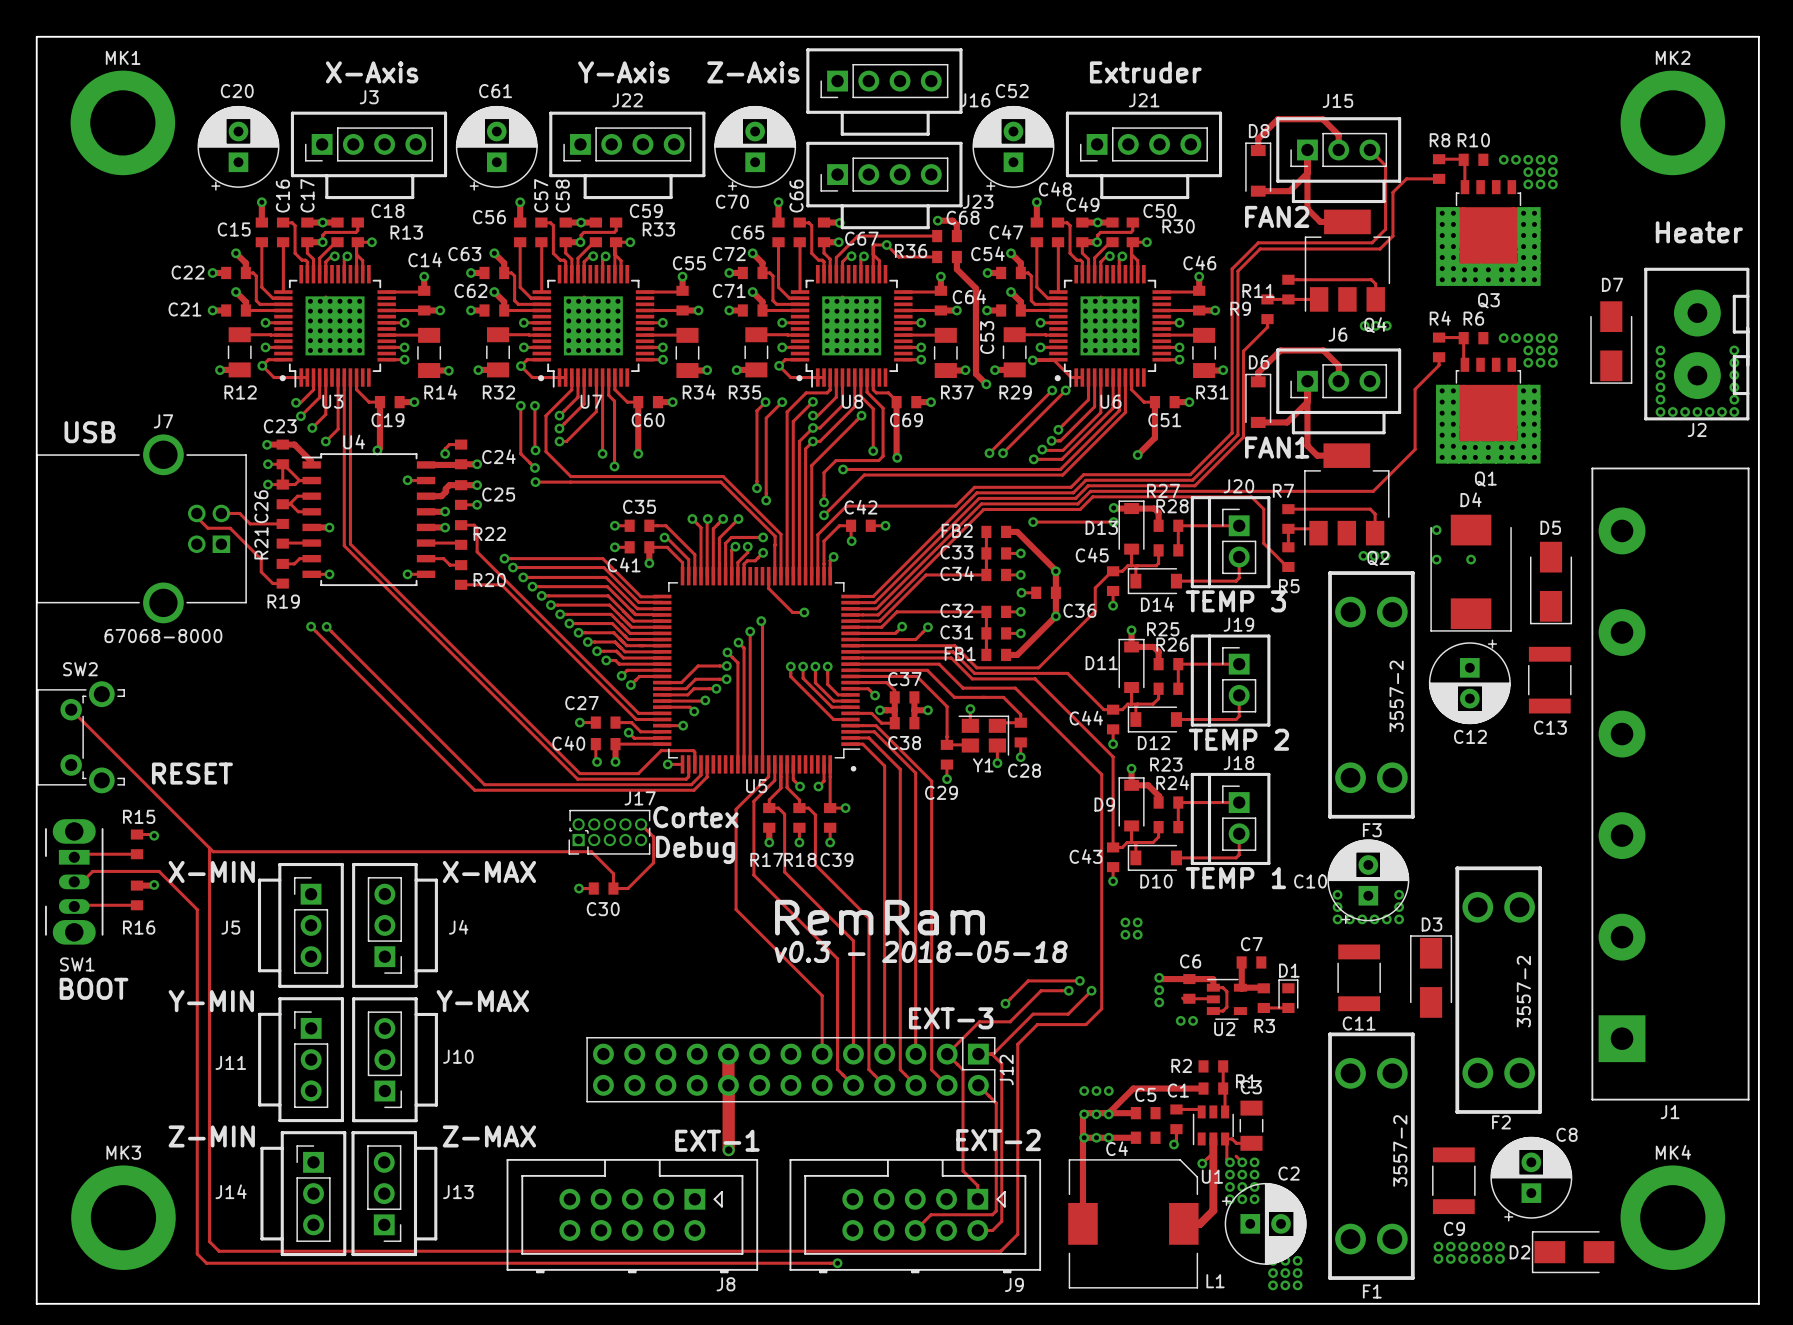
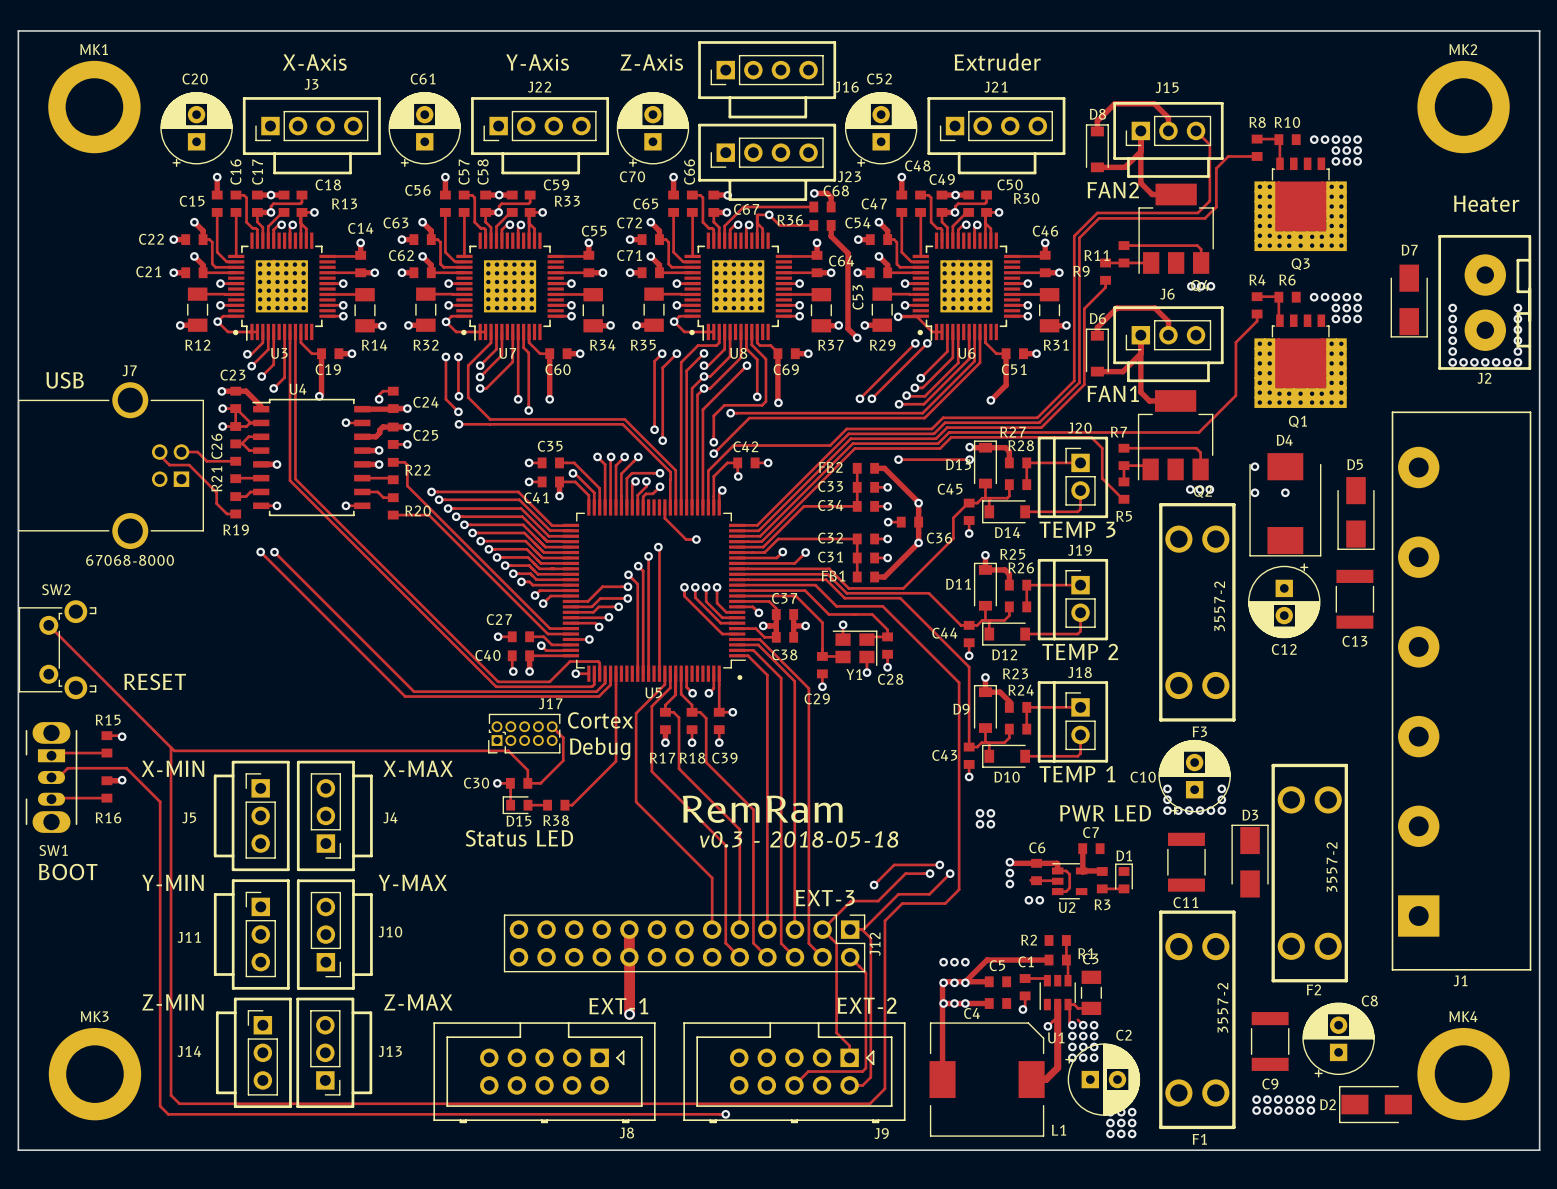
track: none -> (616, 673) (616, 761) (572, 805) (564, 805)
track: none -> (510, 783) (510, 805)
C30 name position: C30 (603, 909) -> C30 (476, 783)
D15: none -> (517, 805)
track: none -> (527, 805) (547, 805)
R38: none -> (556, 805)
text: none -> PWR LED (1105, 813)
text: none -> Status LED (519, 838)

